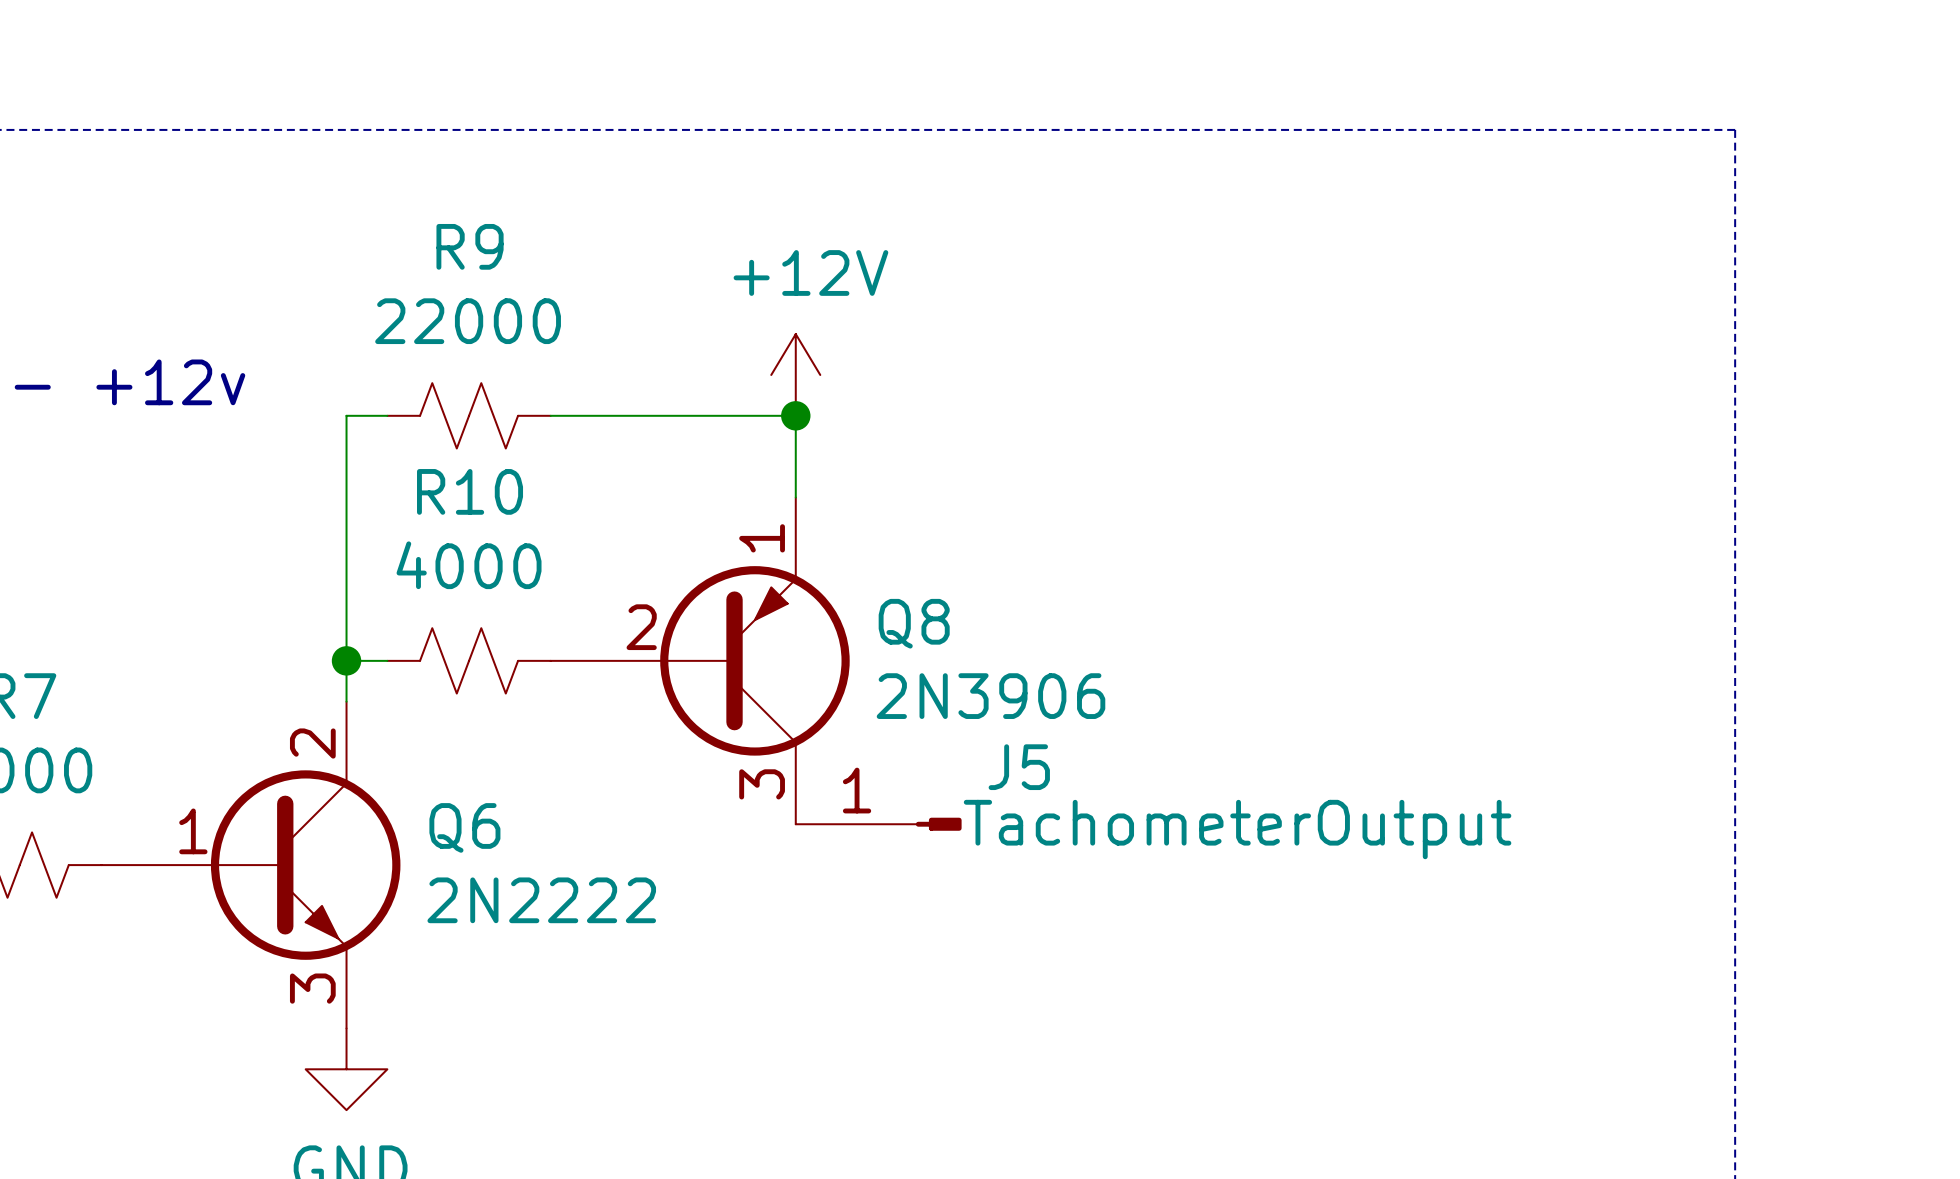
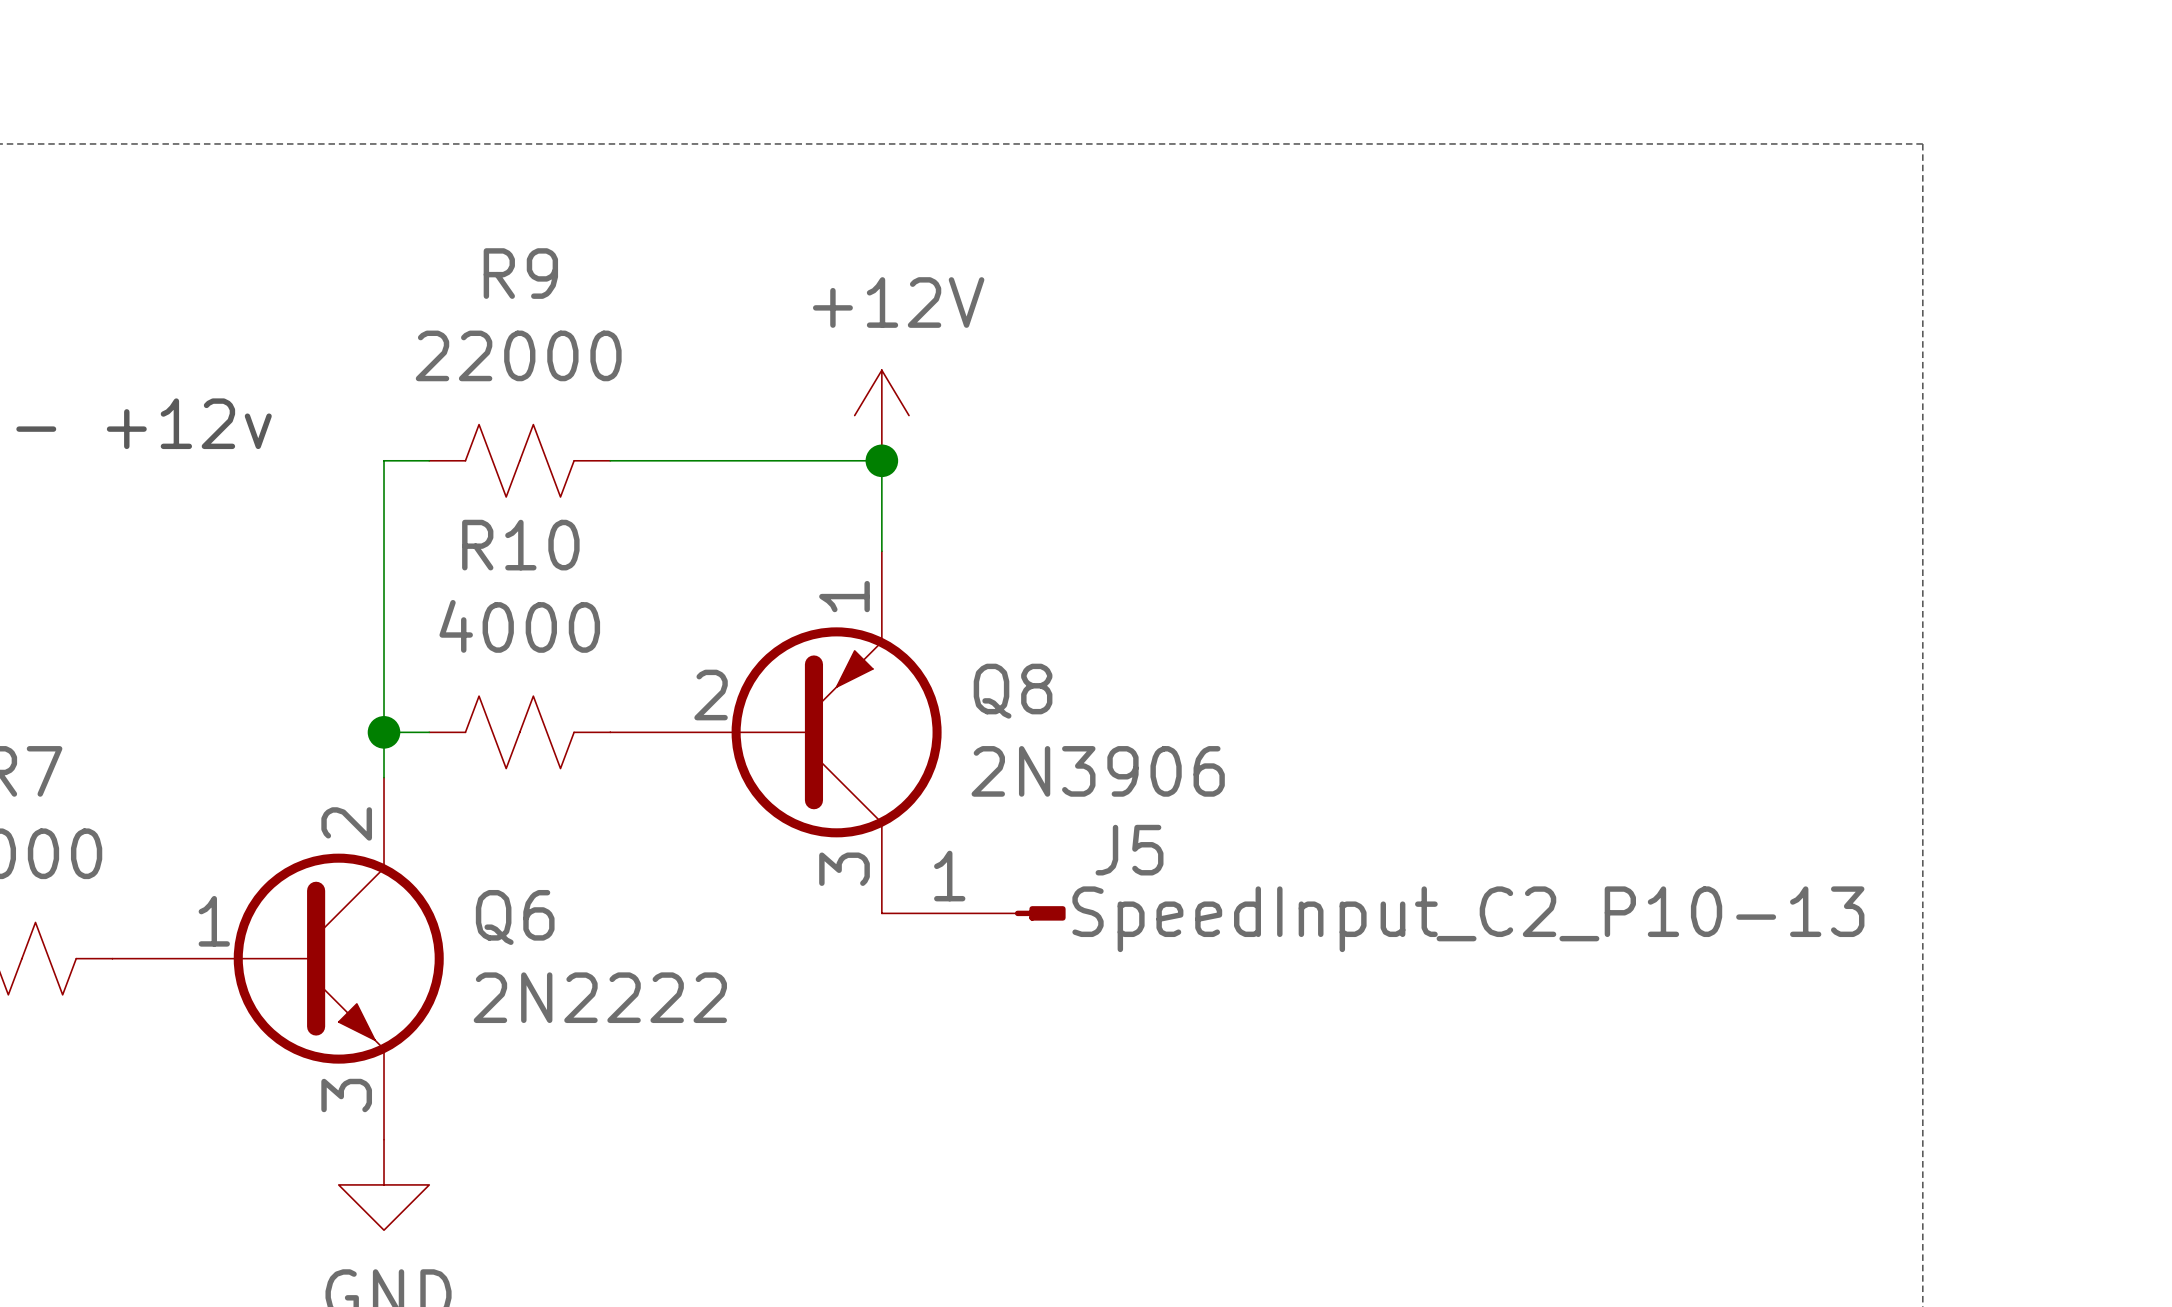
J5 value: TachometerOutput (1237, 829) -> SpeedInput_C2_P10-13 (1468, 919)

